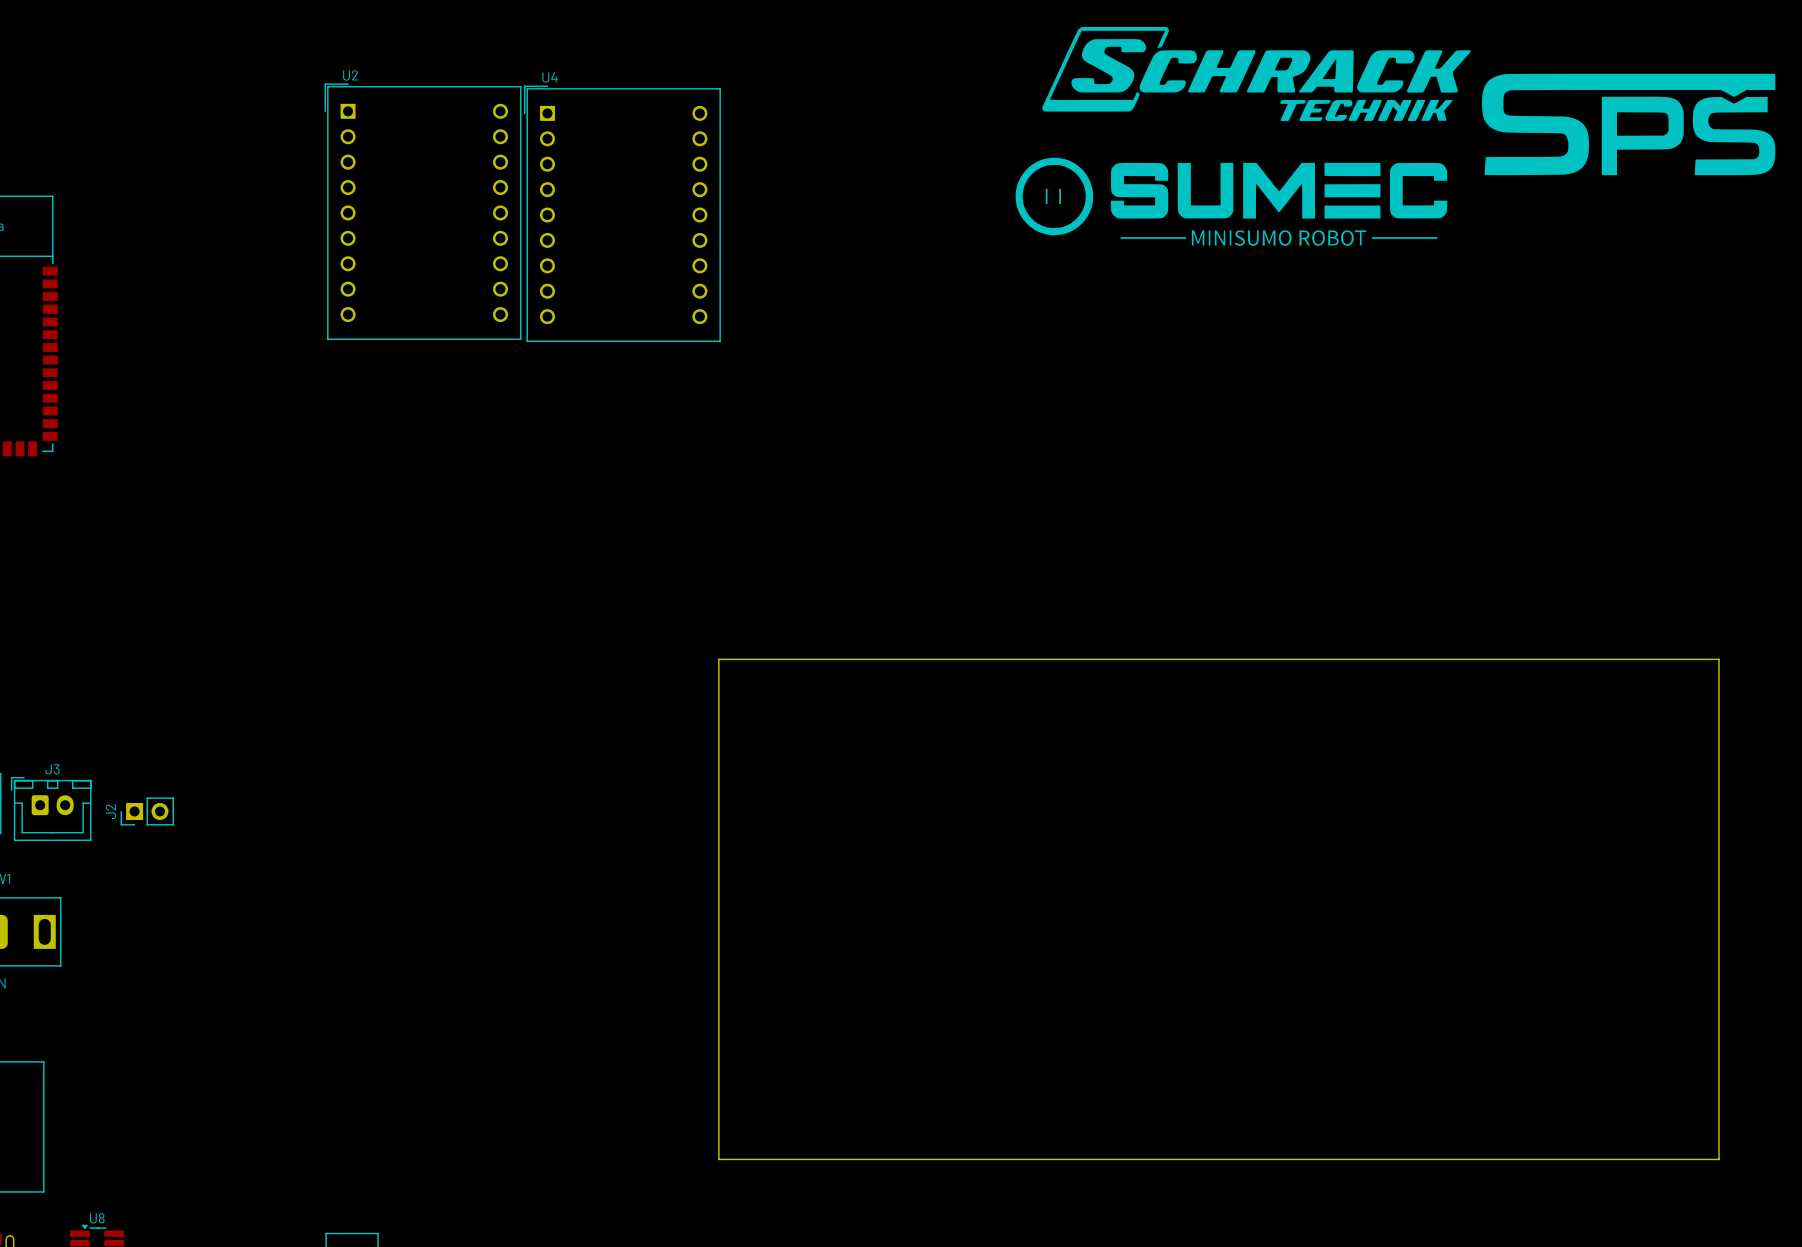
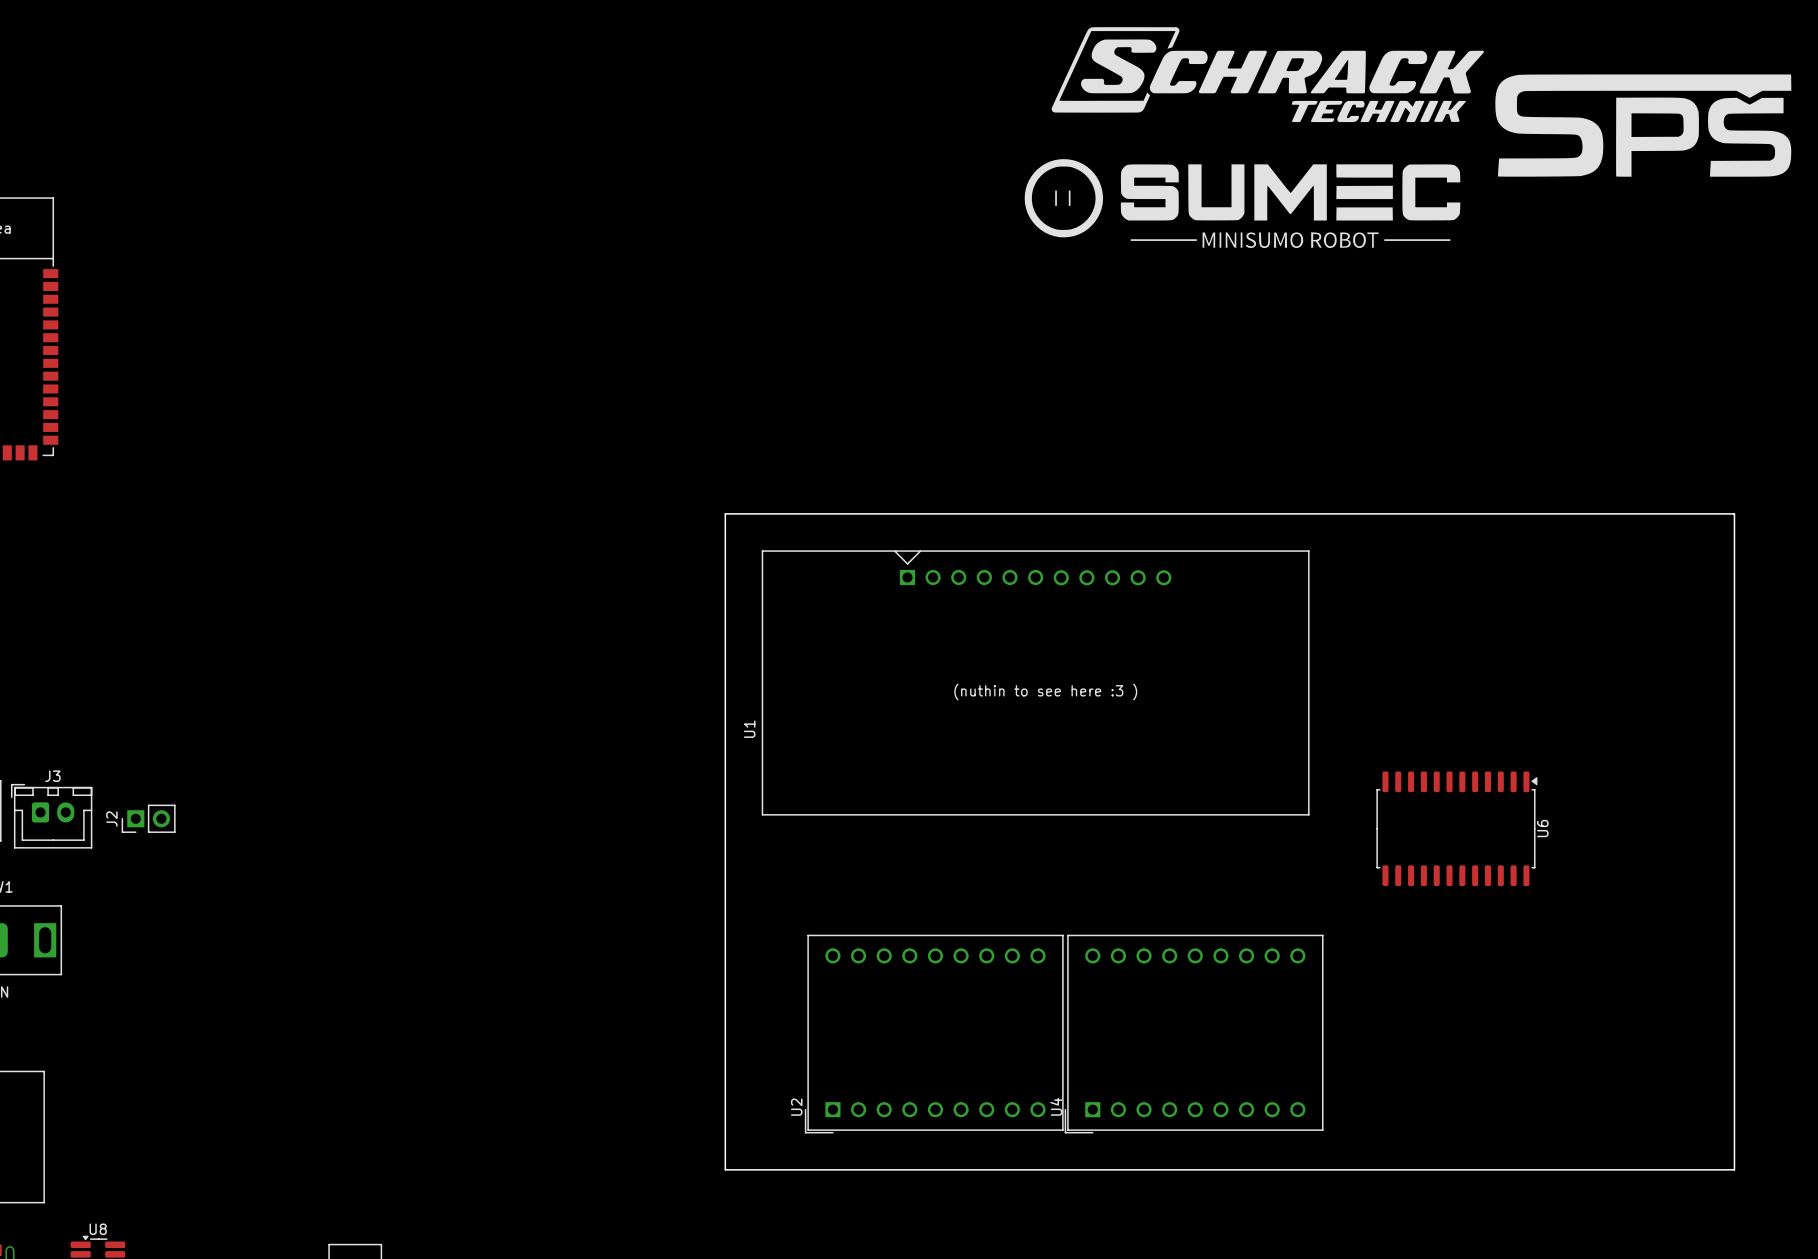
U2 rotation: 0° (423, 211) -> 90° counterclockwise (934, 1034)
U2 position: (423, 211) -> (934, 1034)
U4 rotation: 0° (622, 213) -> 90° counterclockwise (1194, 1034)
U4 position: (622, 213) -> (1194, 1034)
board edge: (718, 659) (1719, 659) -> (725, 665) (725, 513) (1734, 513) (1734, 665)
U1: none -> (1035, 682)
U6: none -> (1456, 828)

